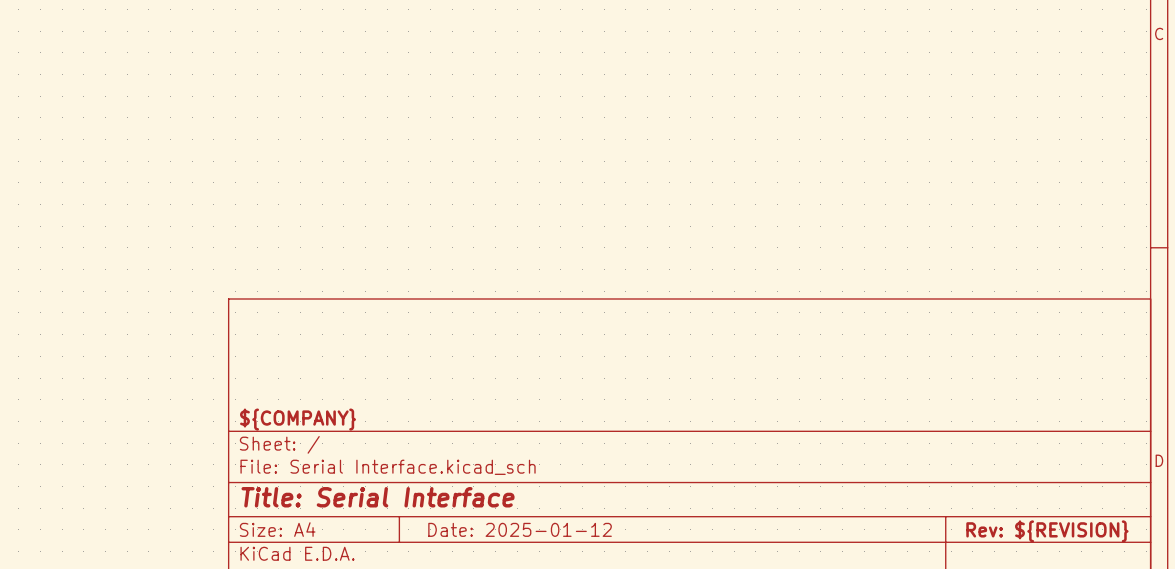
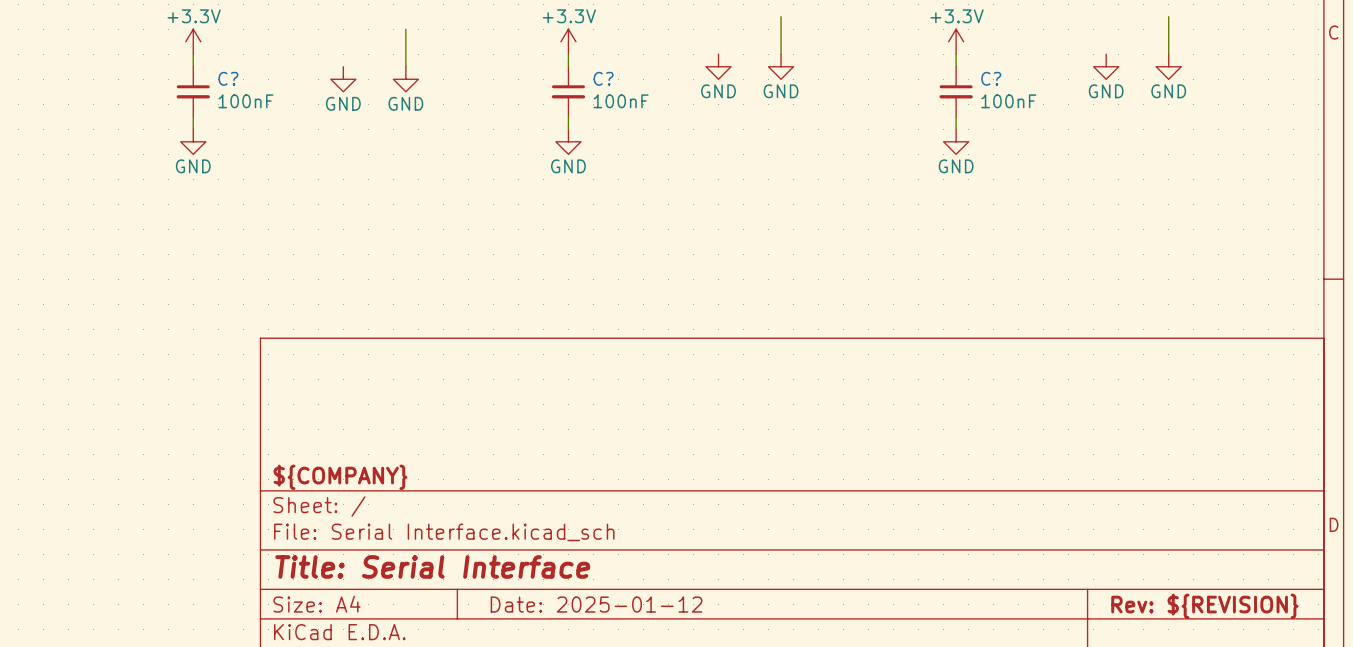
wire: none -> (781, 16) (781, 54)
wire: none -> (1168, 16) (1168, 54)
wire: none -> (405, 29) (405, 66)
power symbol: none -> +3.3V (193, 41)
power symbol: none -> +3.3V (568, 41)
power symbol: none -> +3.3V (956, 41)
wire: none -> (193, 54) (193, 66)
wire: none -> (568, 54) (568, 66)
wire: none -> (956, 54) (956, 66)
power symbol: none -> GND (718, 66)
power symbol: none -> GND (781, 66)
power symbol: none -> GND (1106, 66)
power symbol: none -> GND (1168, 66)
power symbol: none -> GND (343, 79)
power symbol: none -> GND (405, 79)
C?: none -> 100nF (193, 91)
C?: none -> 100nF (568, 91)
C?: none -> 100nF (956, 91)
wire: none -> (193, 116) (193, 129)
wire: none -> (568, 116) (568, 129)
wire: none -> (956, 116) (956, 129)
power symbol: none -> GND (193, 141)
power symbol: none -> GND (568, 141)
power symbol: none -> GND (956, 141)

